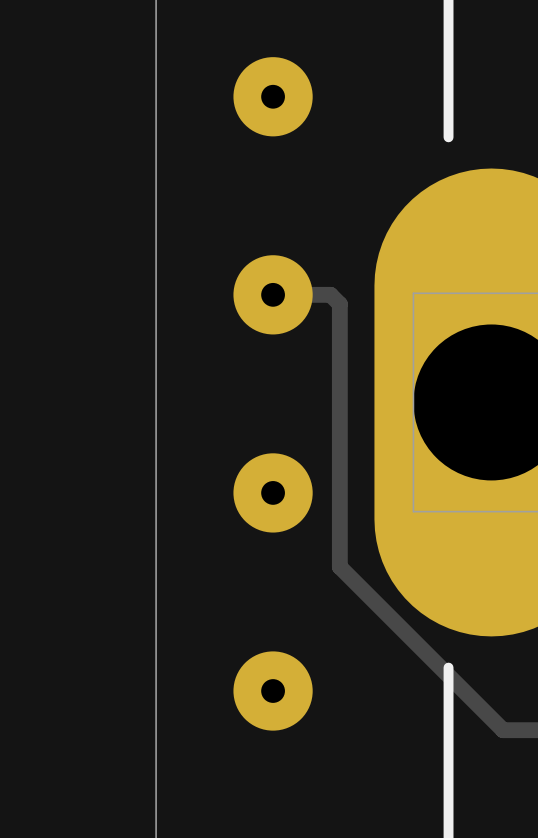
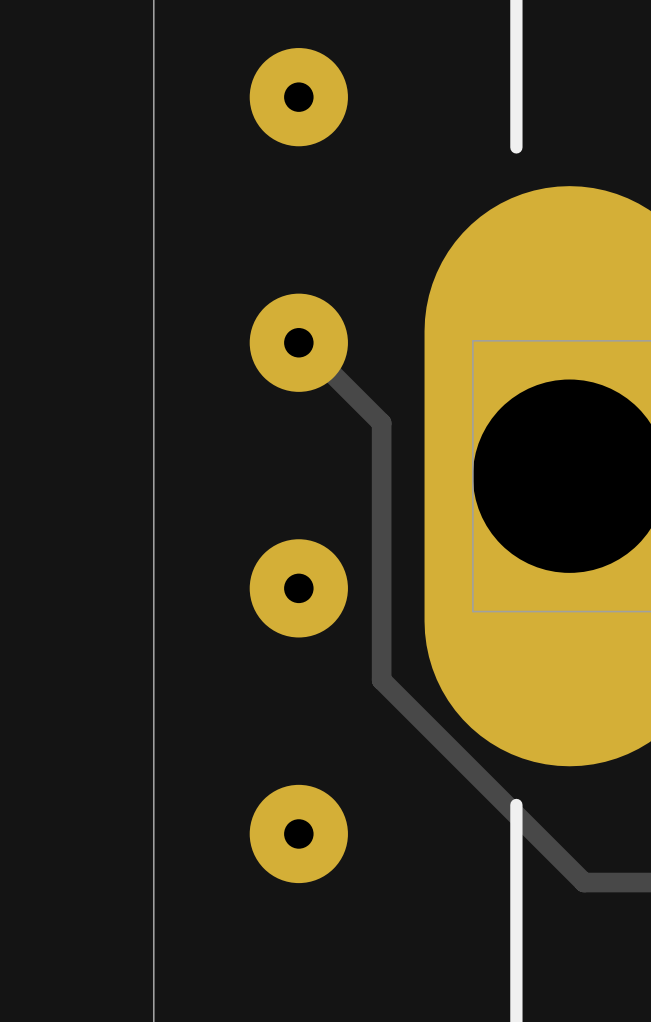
track: (275, 294) (330, 294) (339, 304) (339, 359) -> (301, 342) (381, 423)

